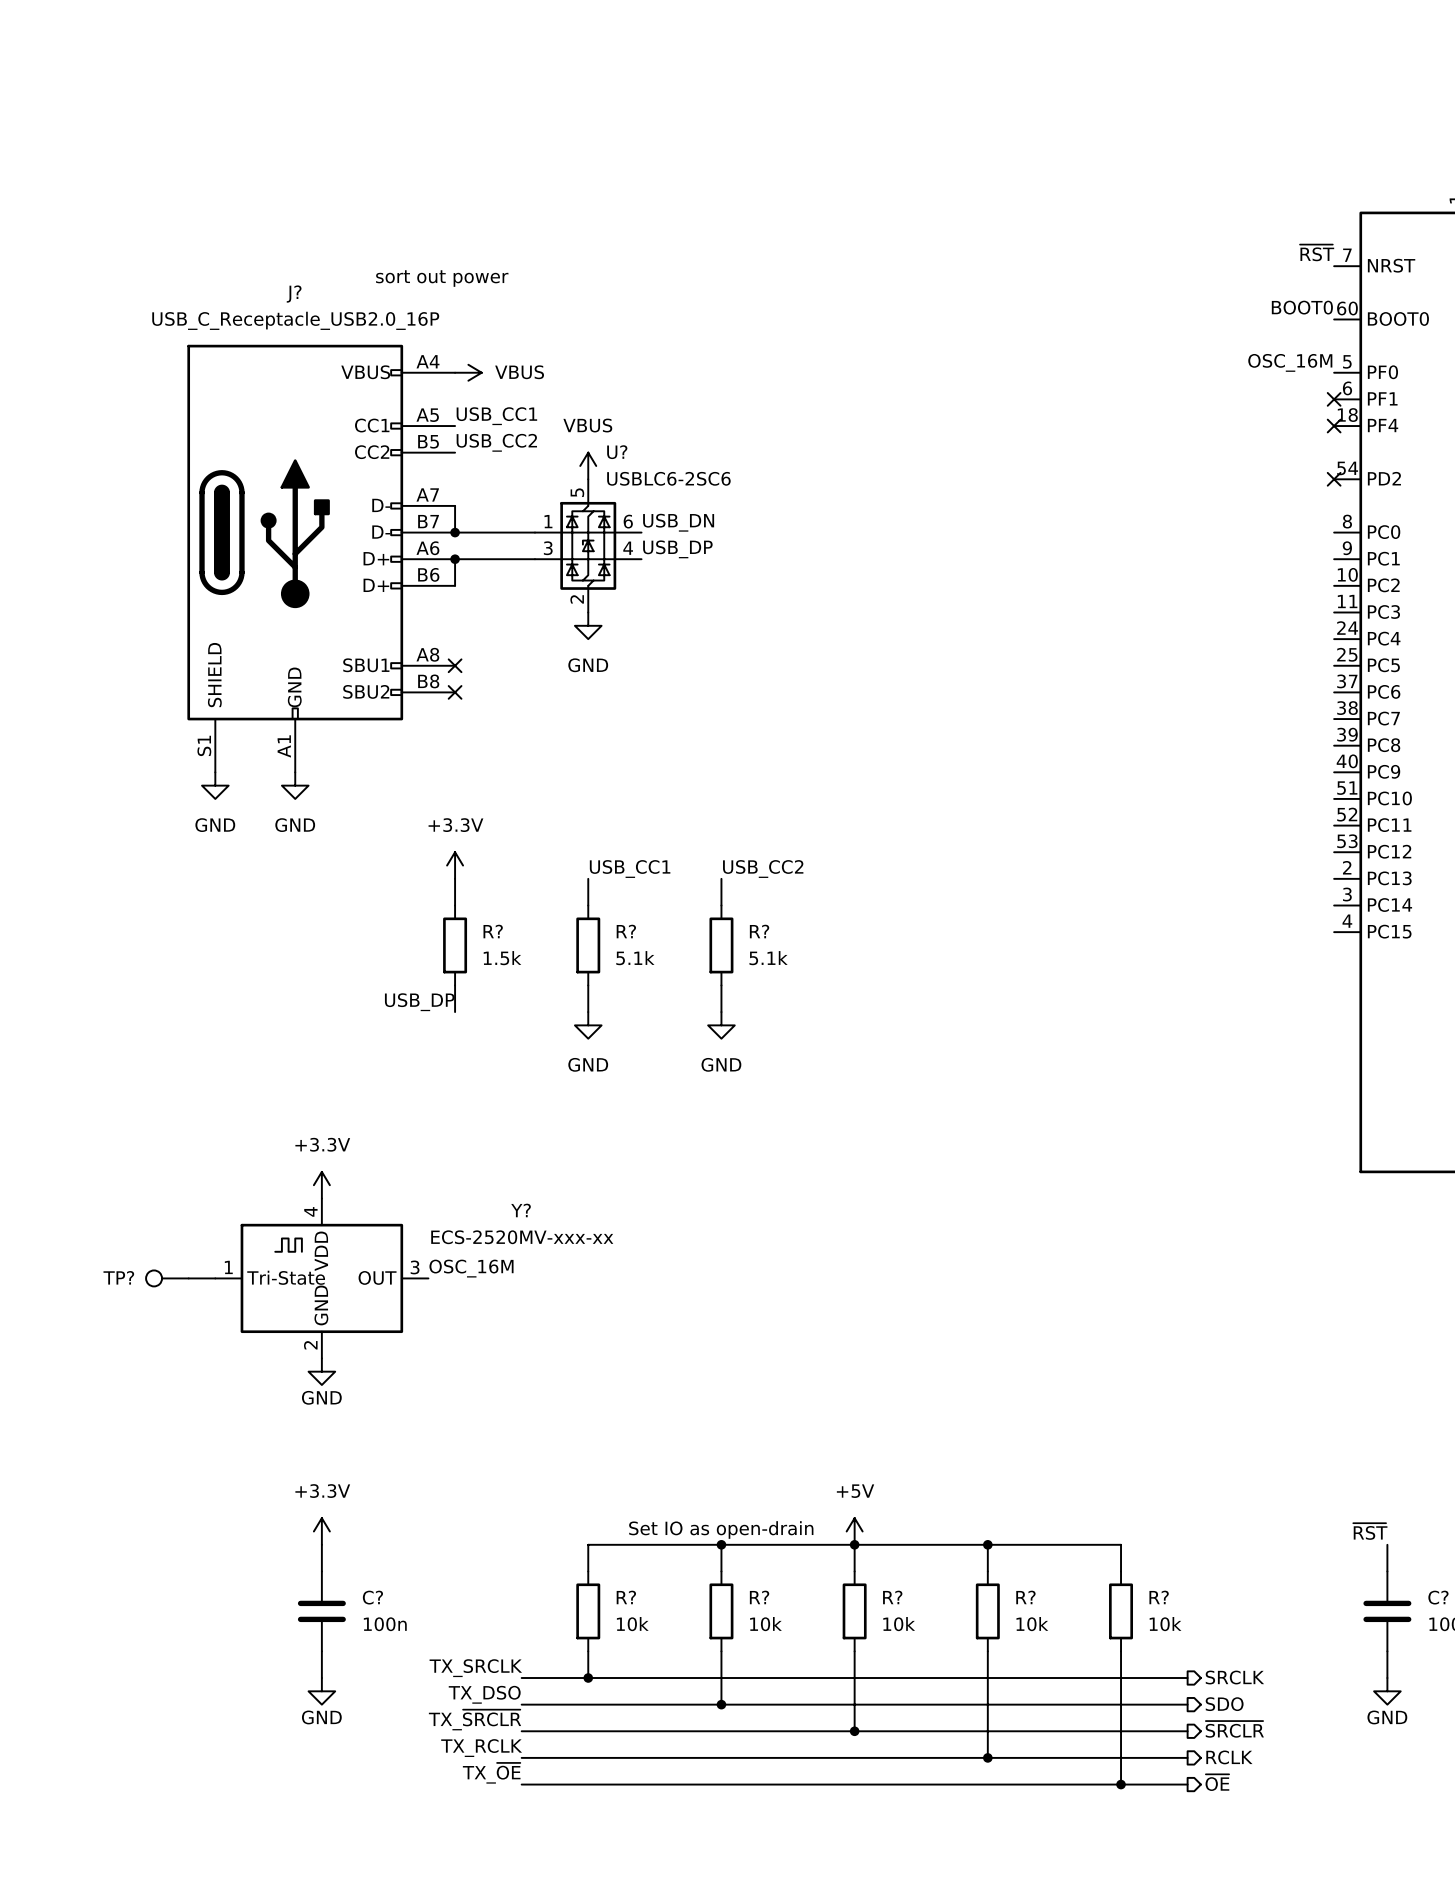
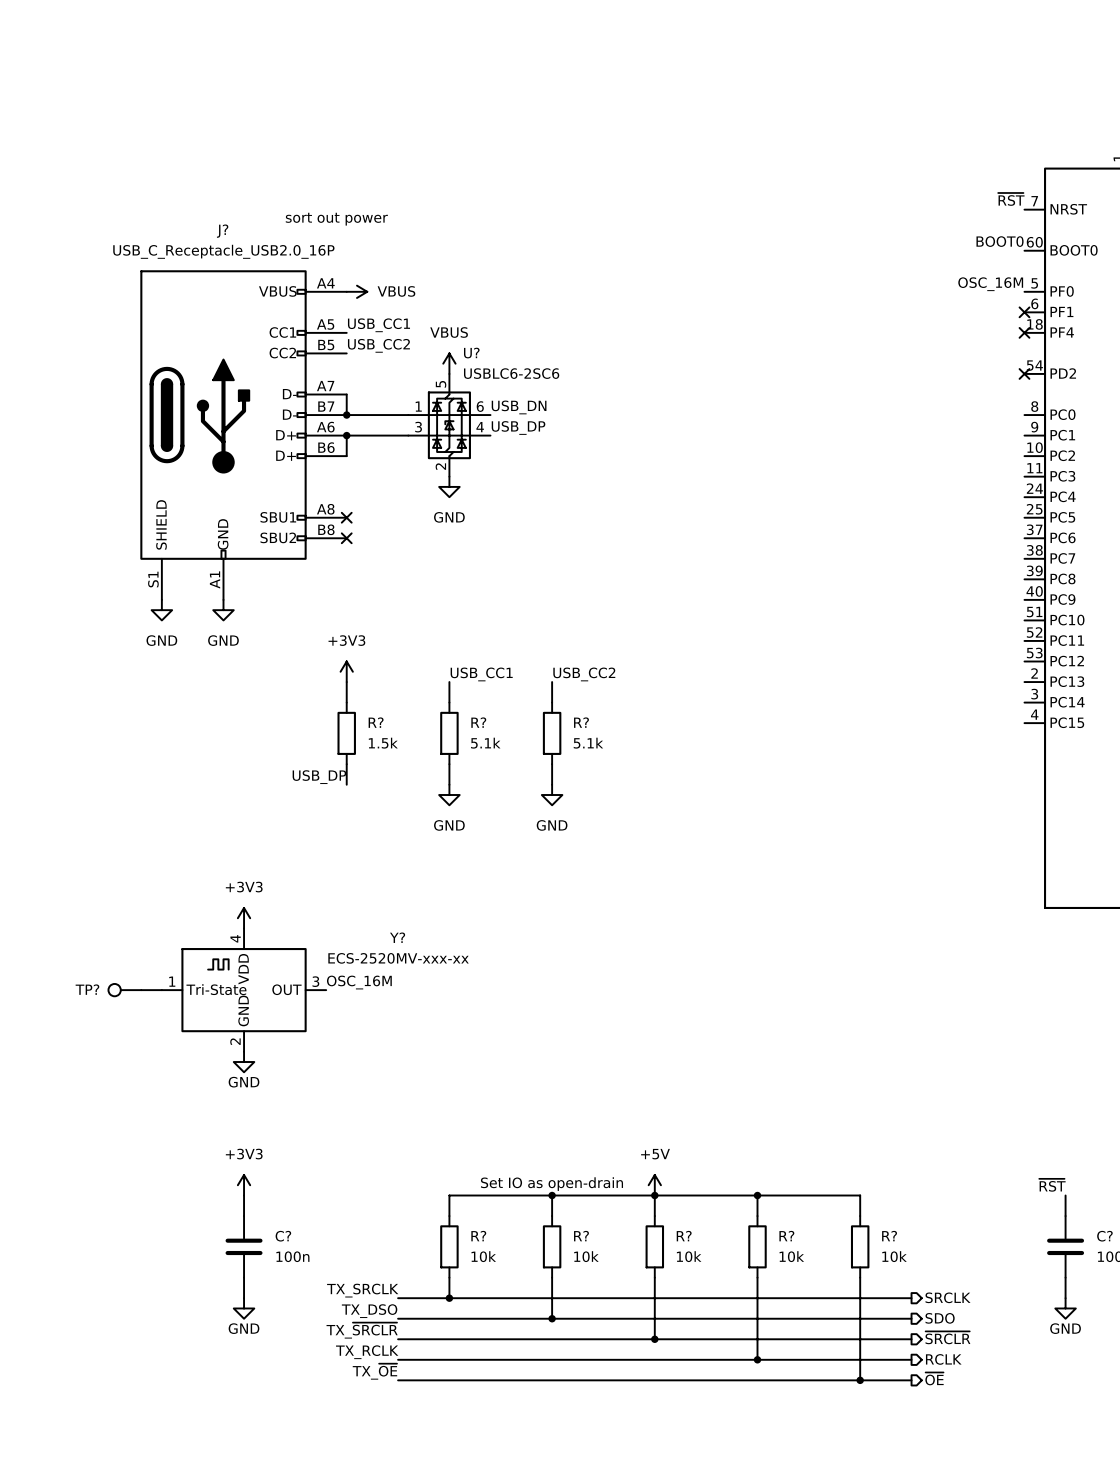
power symbol: +3.3V (455, 865) -> +3V3 (346, 671)
power symbol: +3.3V (321, 1185) -> +3V3 (244, 918)
power symbol: +3.3V (321, 1531) -> +3V3 (244, 1185)

